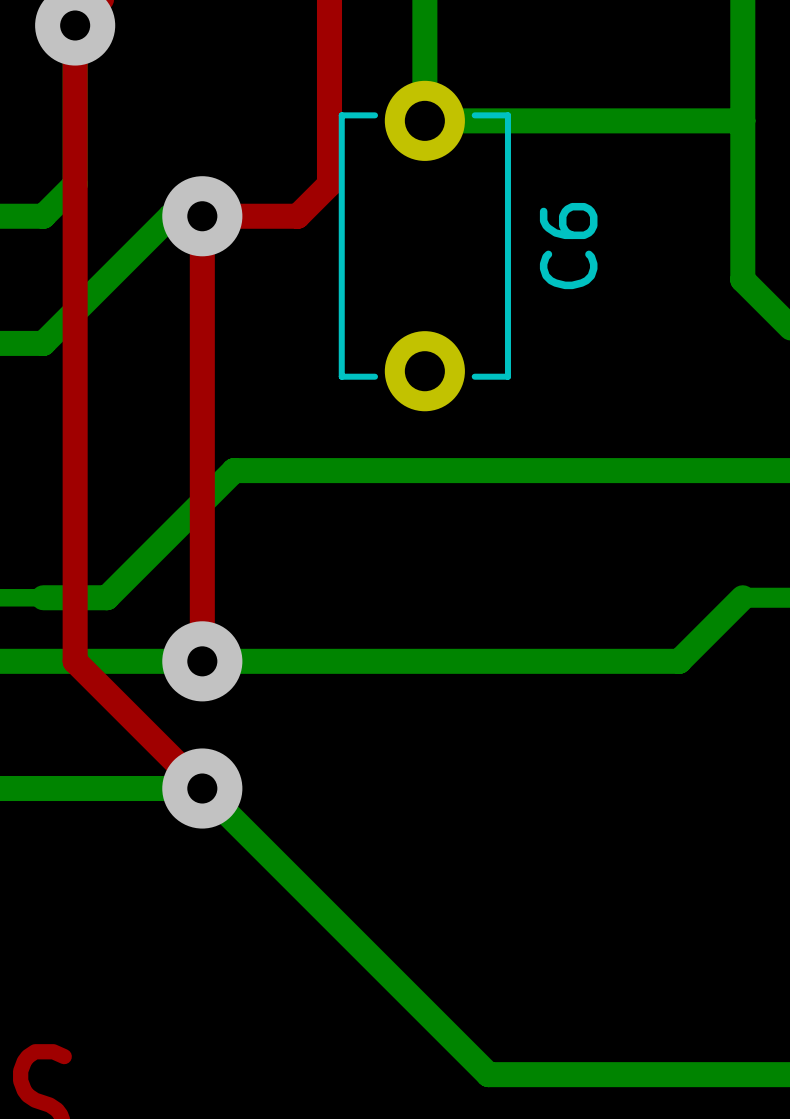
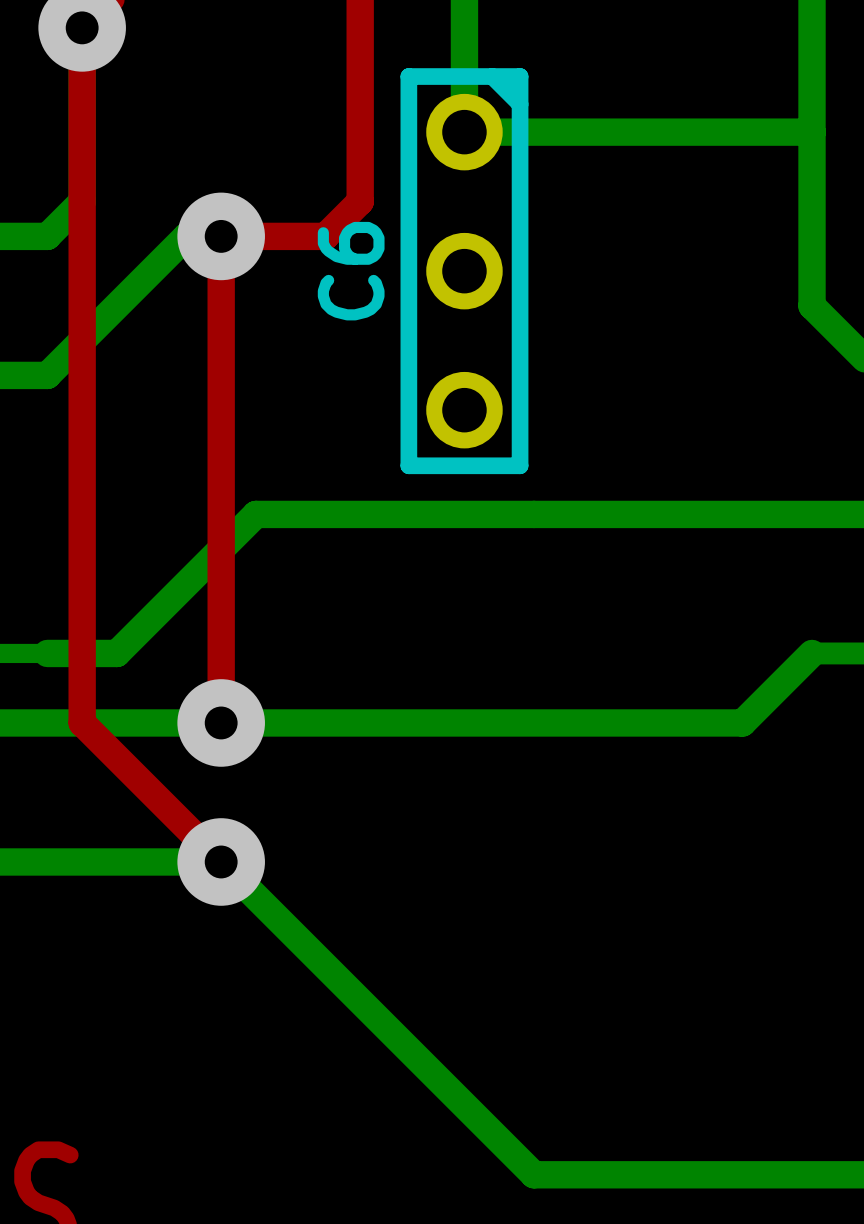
C6 footprint: [338, 80, 511, 412] -> [400, 68, 529, 475]
C6 name position: C6 (568, 246) -> C6 (351, 271)

